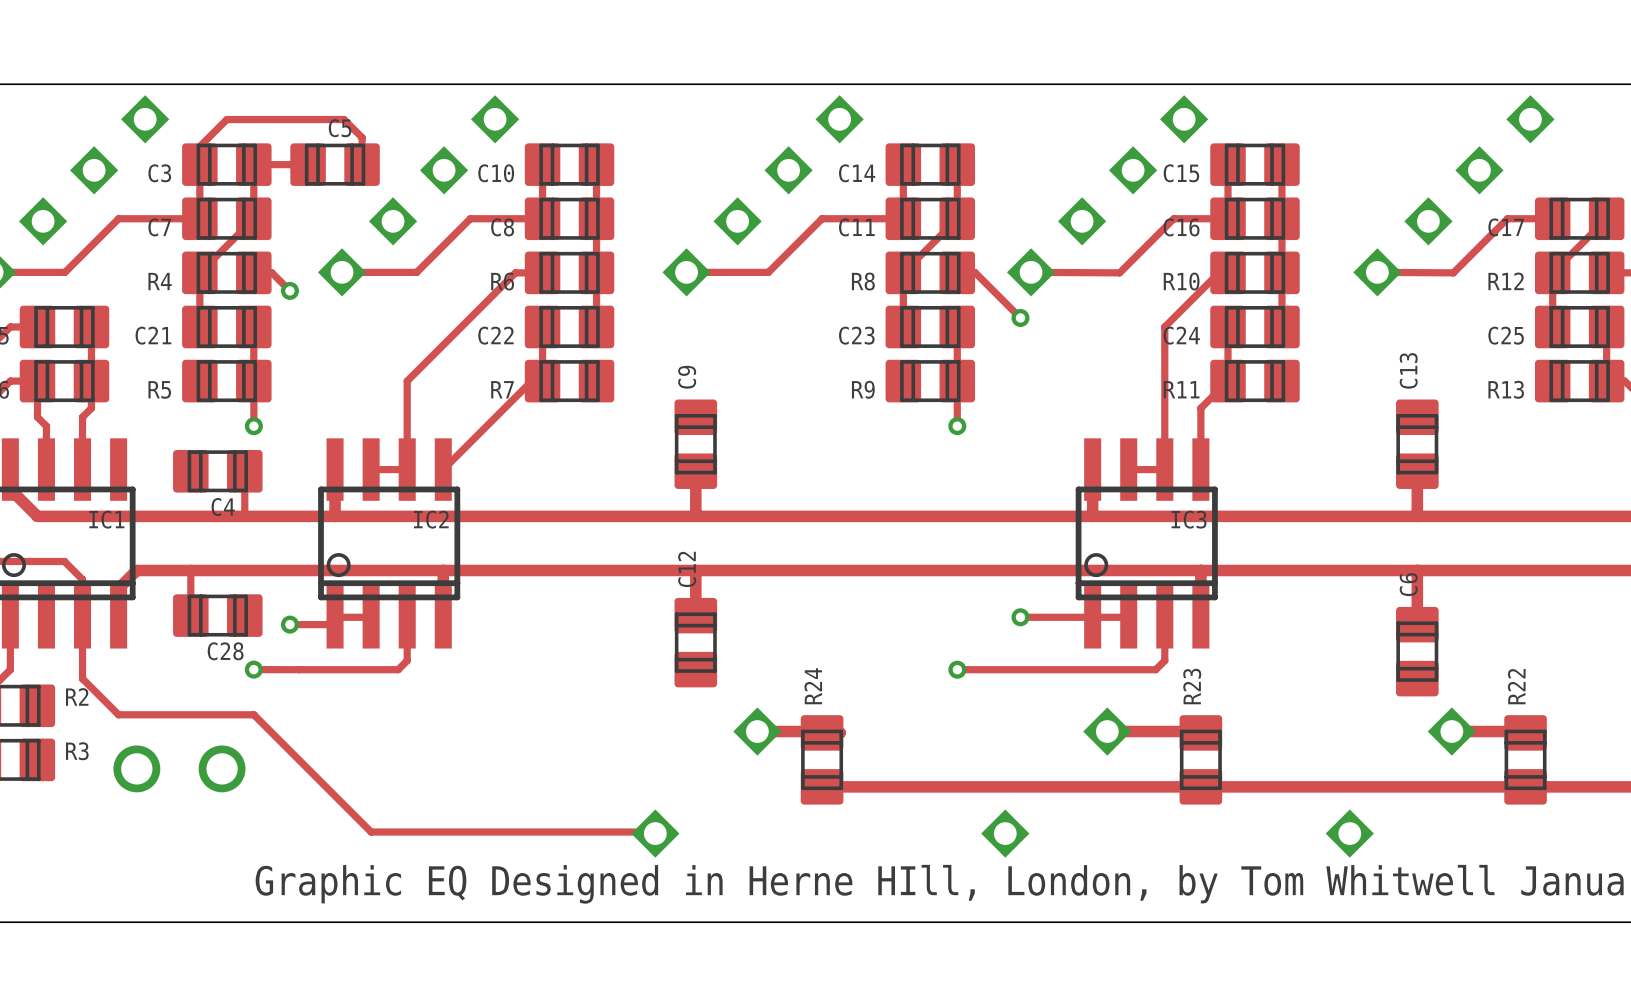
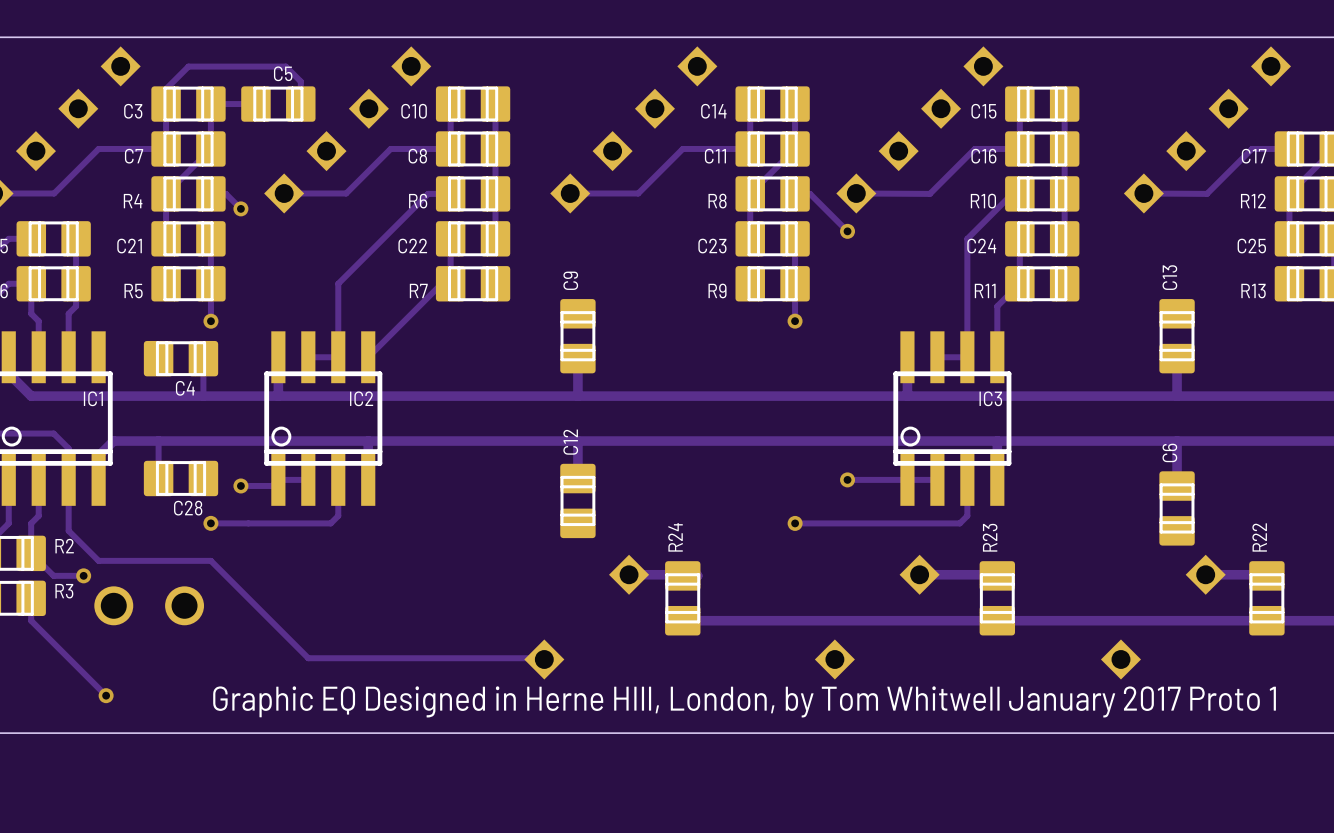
track: none -> (38, 479) (38, 515) (31, 523) (31, 553) (53, 575) (83, 575)
via: none -> (83, 575)
track: none -> (31, 598) (31, 620) (106, 695)
via: none -> (106, 695)

